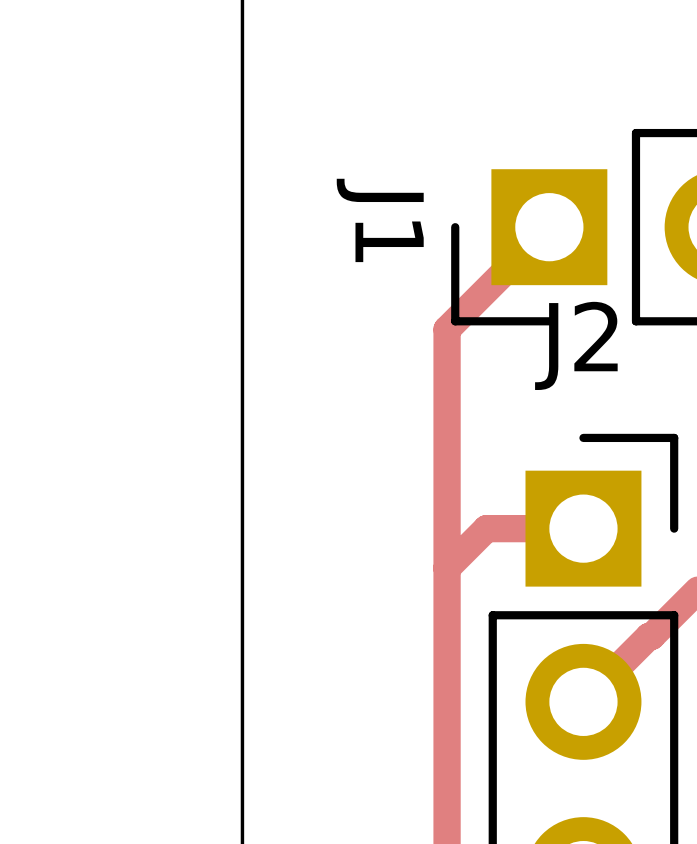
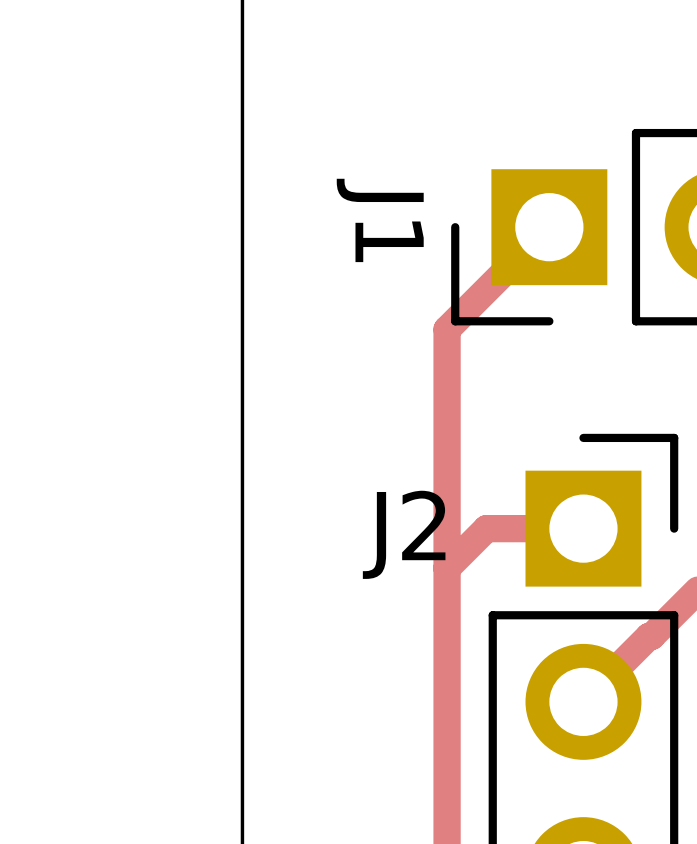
J2 name position: J2 (576, 345) -> J2 (404, 534)

